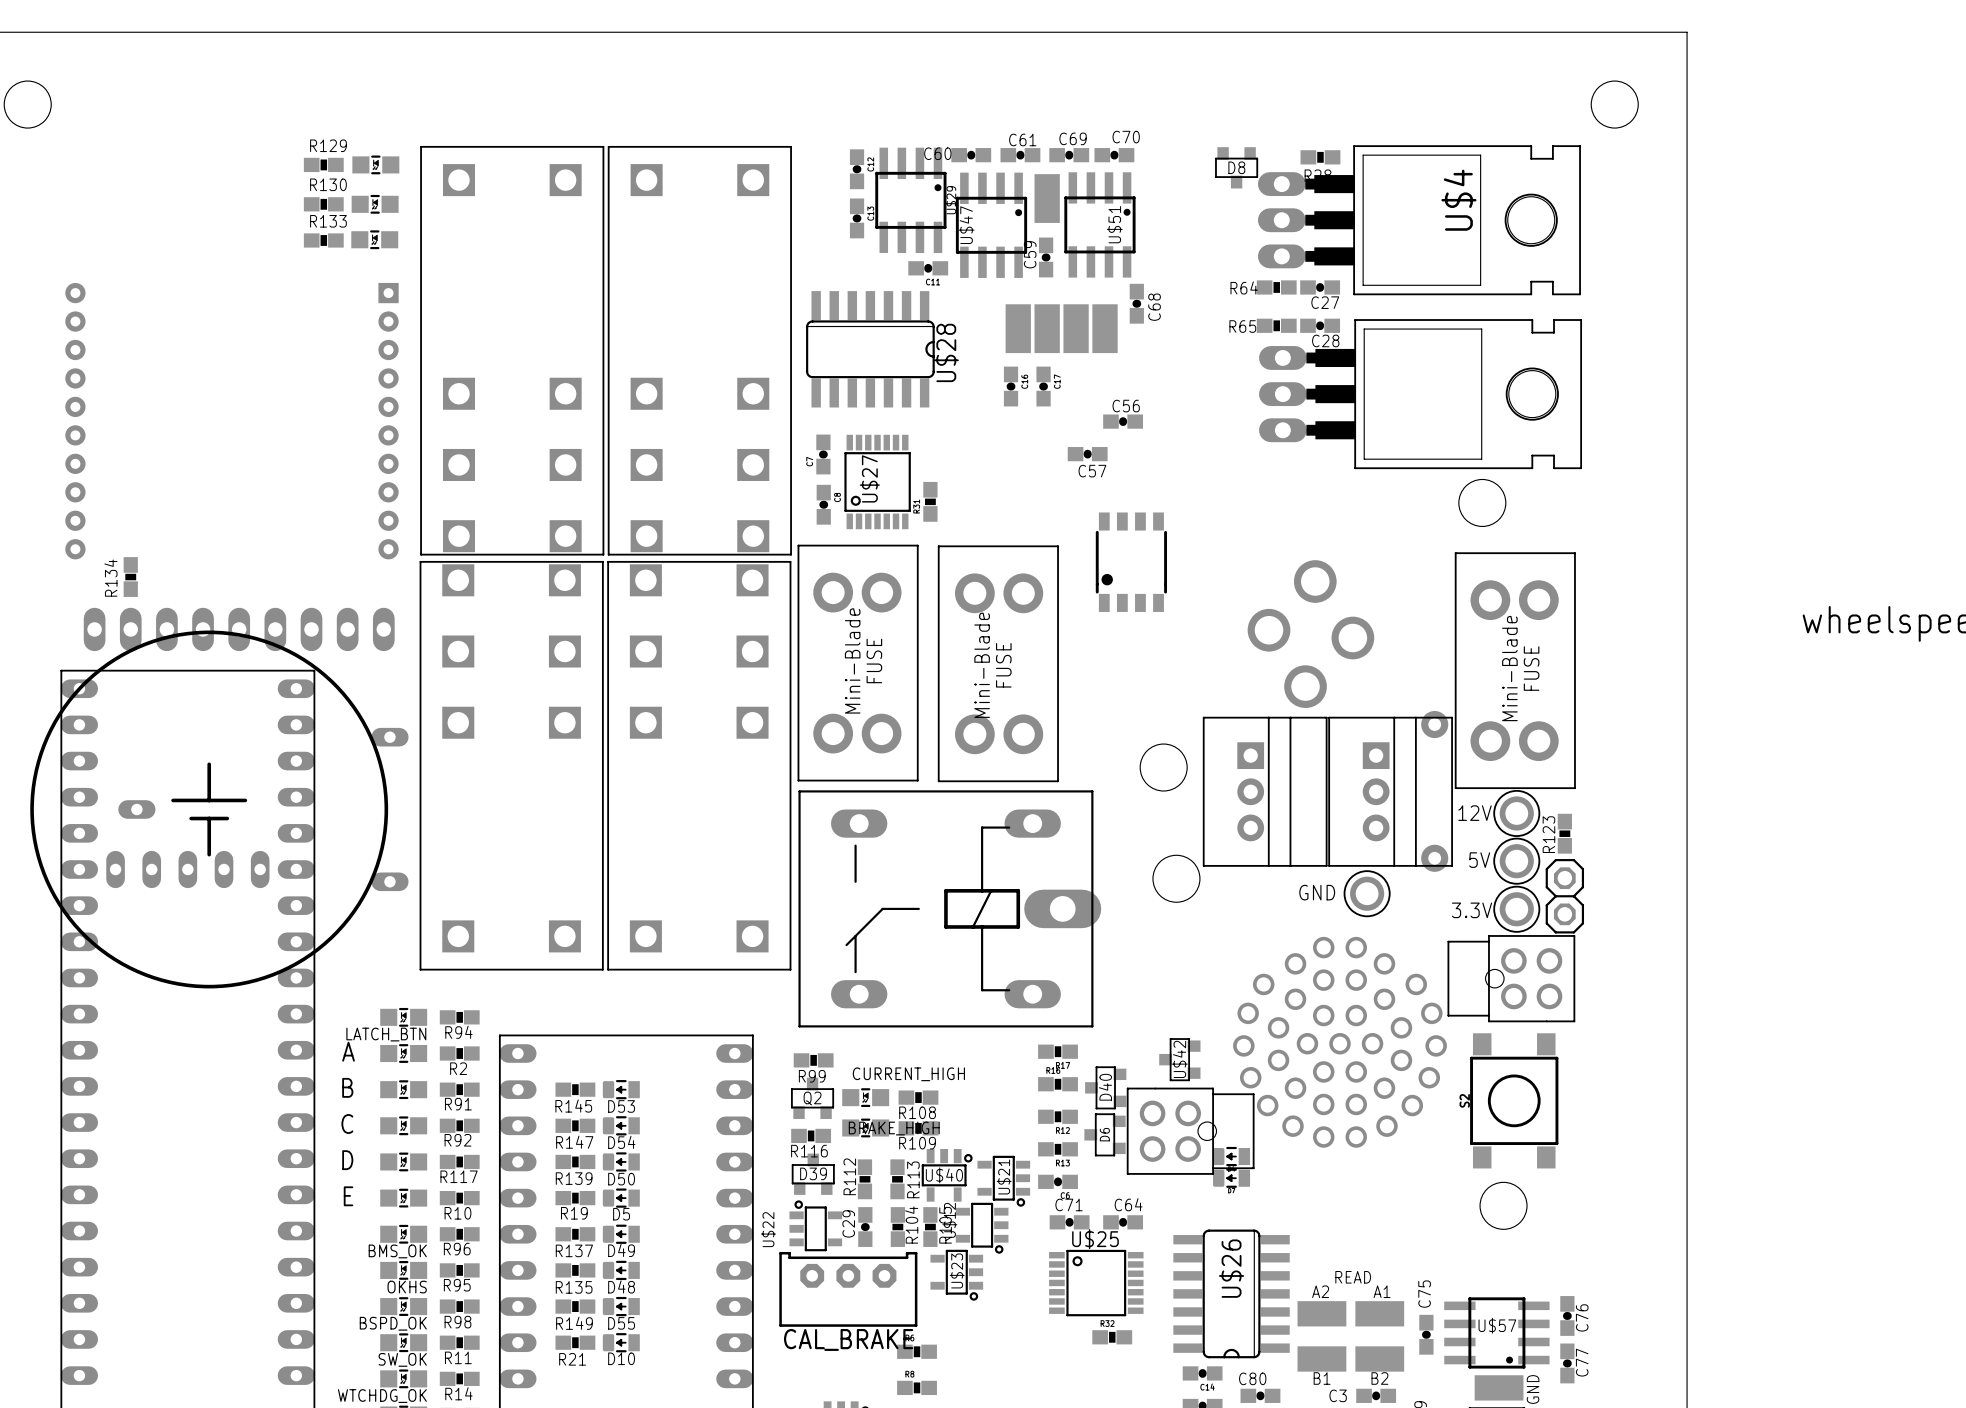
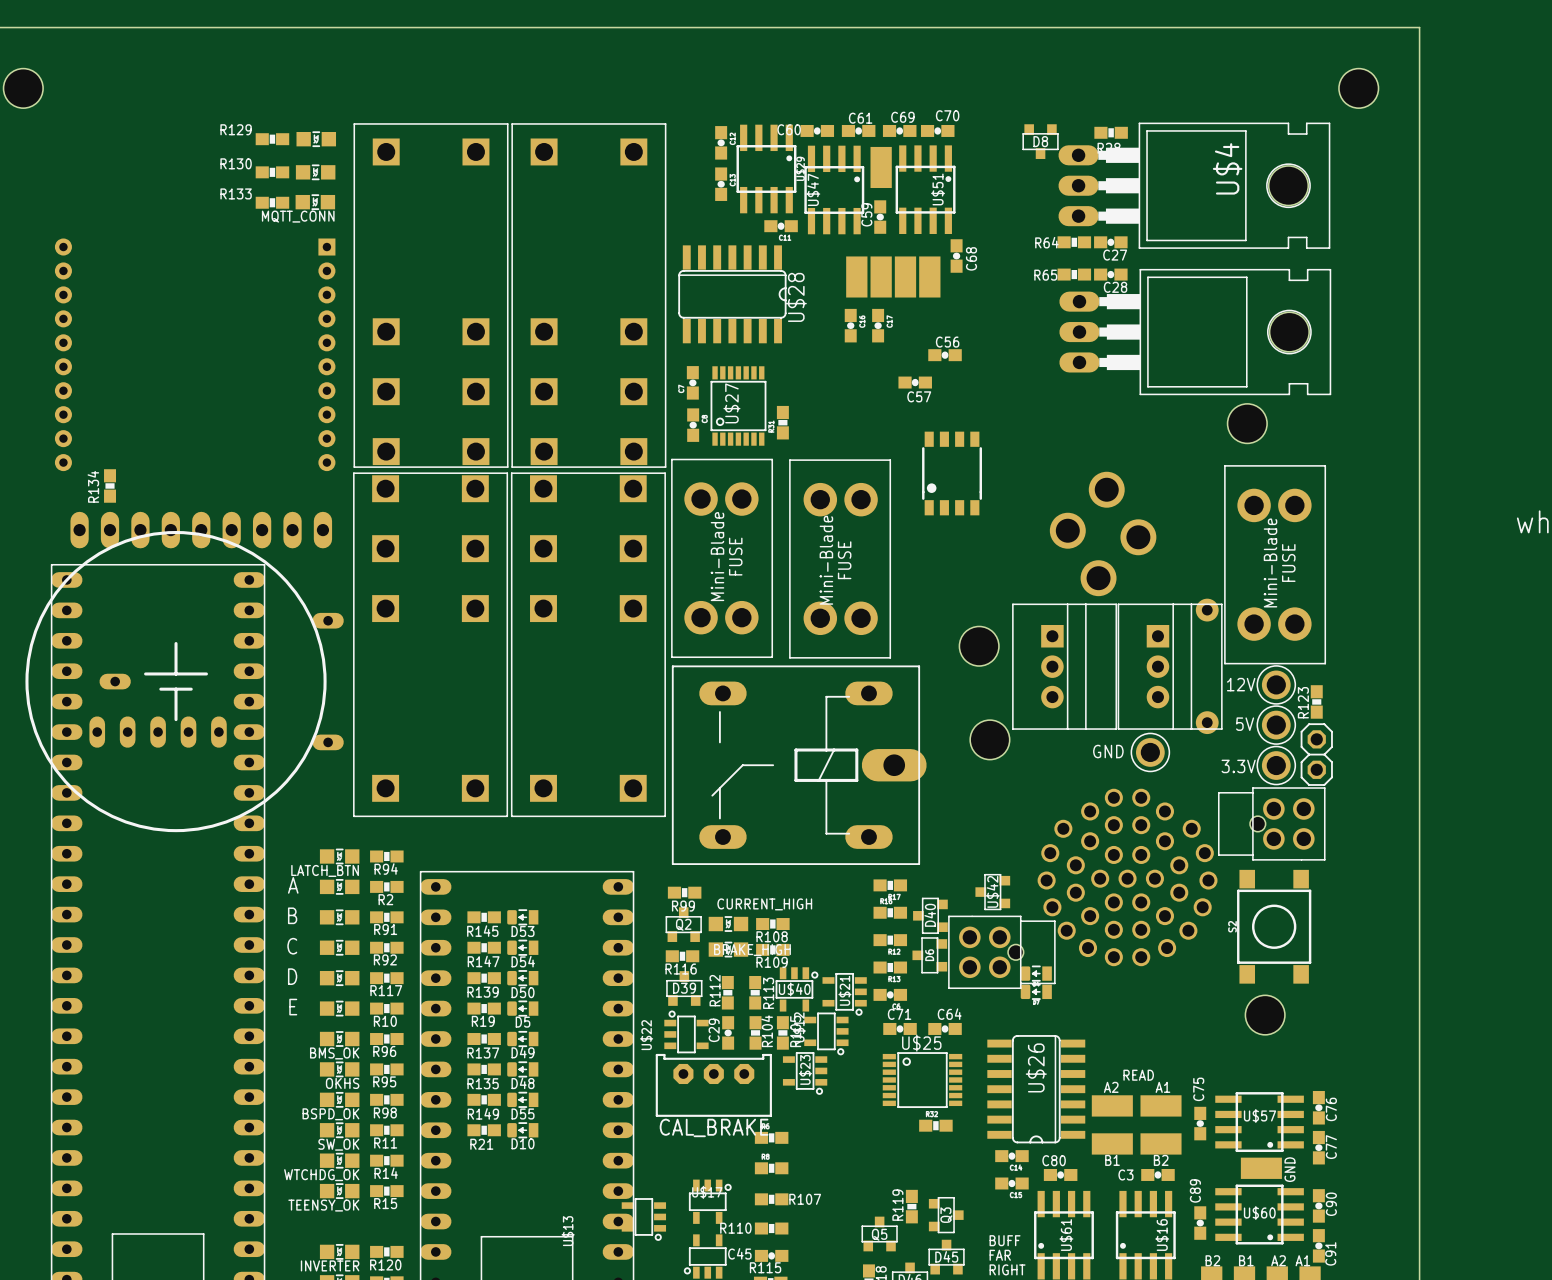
R129 name position: R129 (328, 145) -> R129 (236, 129)
R130 name position: R130 (328, 184) -> R130 (236, 163)
R133 name position: R133 (328, 221) -> R133 (236, 193)
MQTT_CONN name: none -> MQTT_CONN (298, 216)

